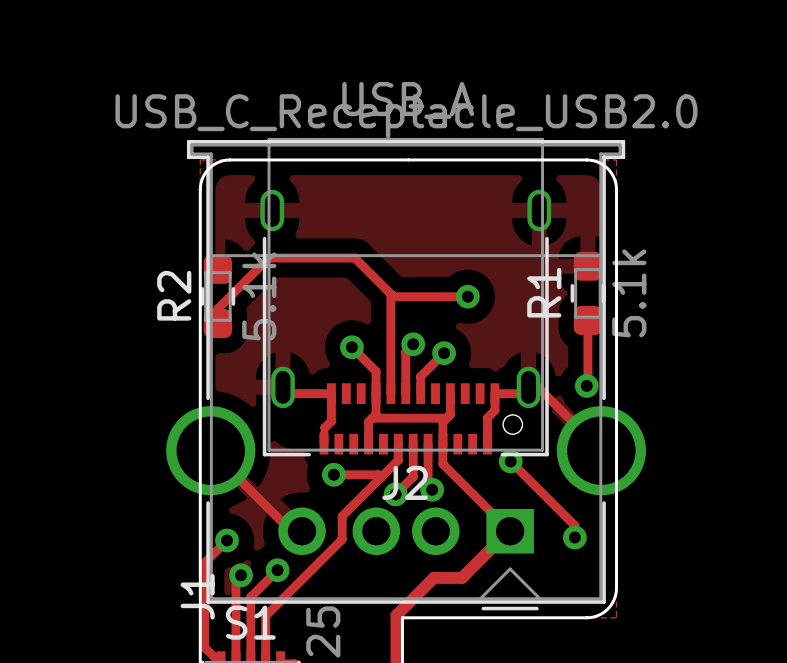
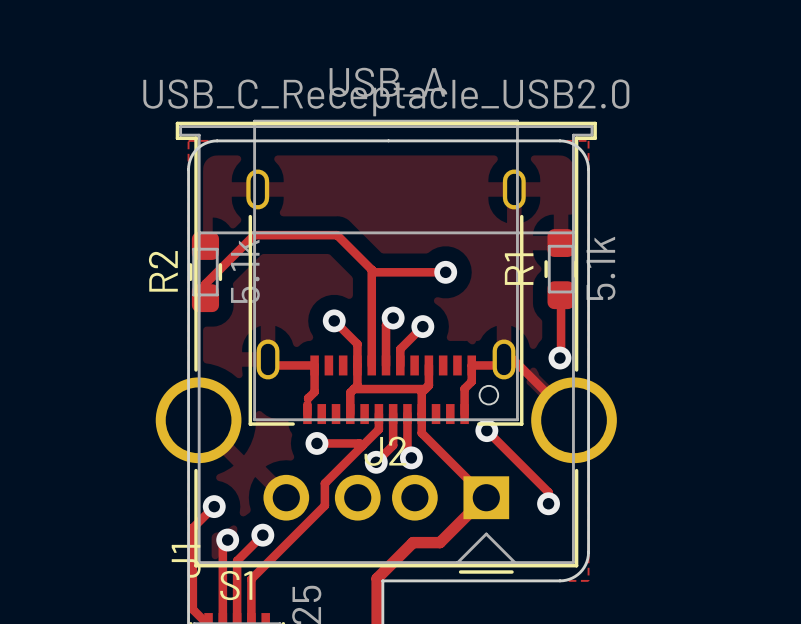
track: (210, 450) (291, 531) -> none

